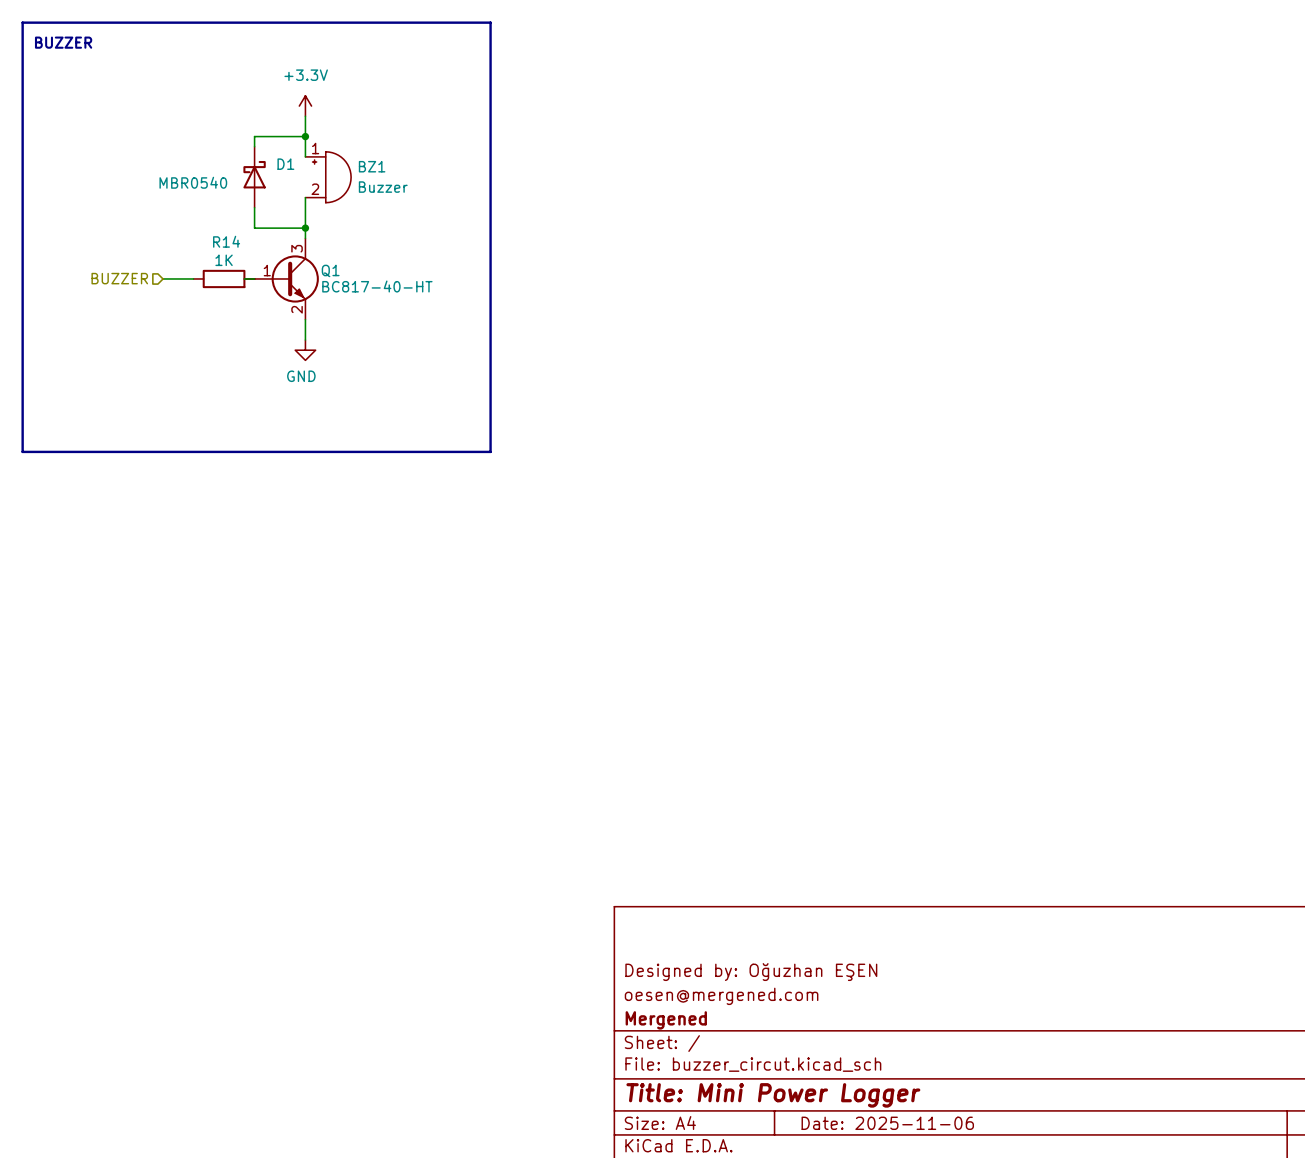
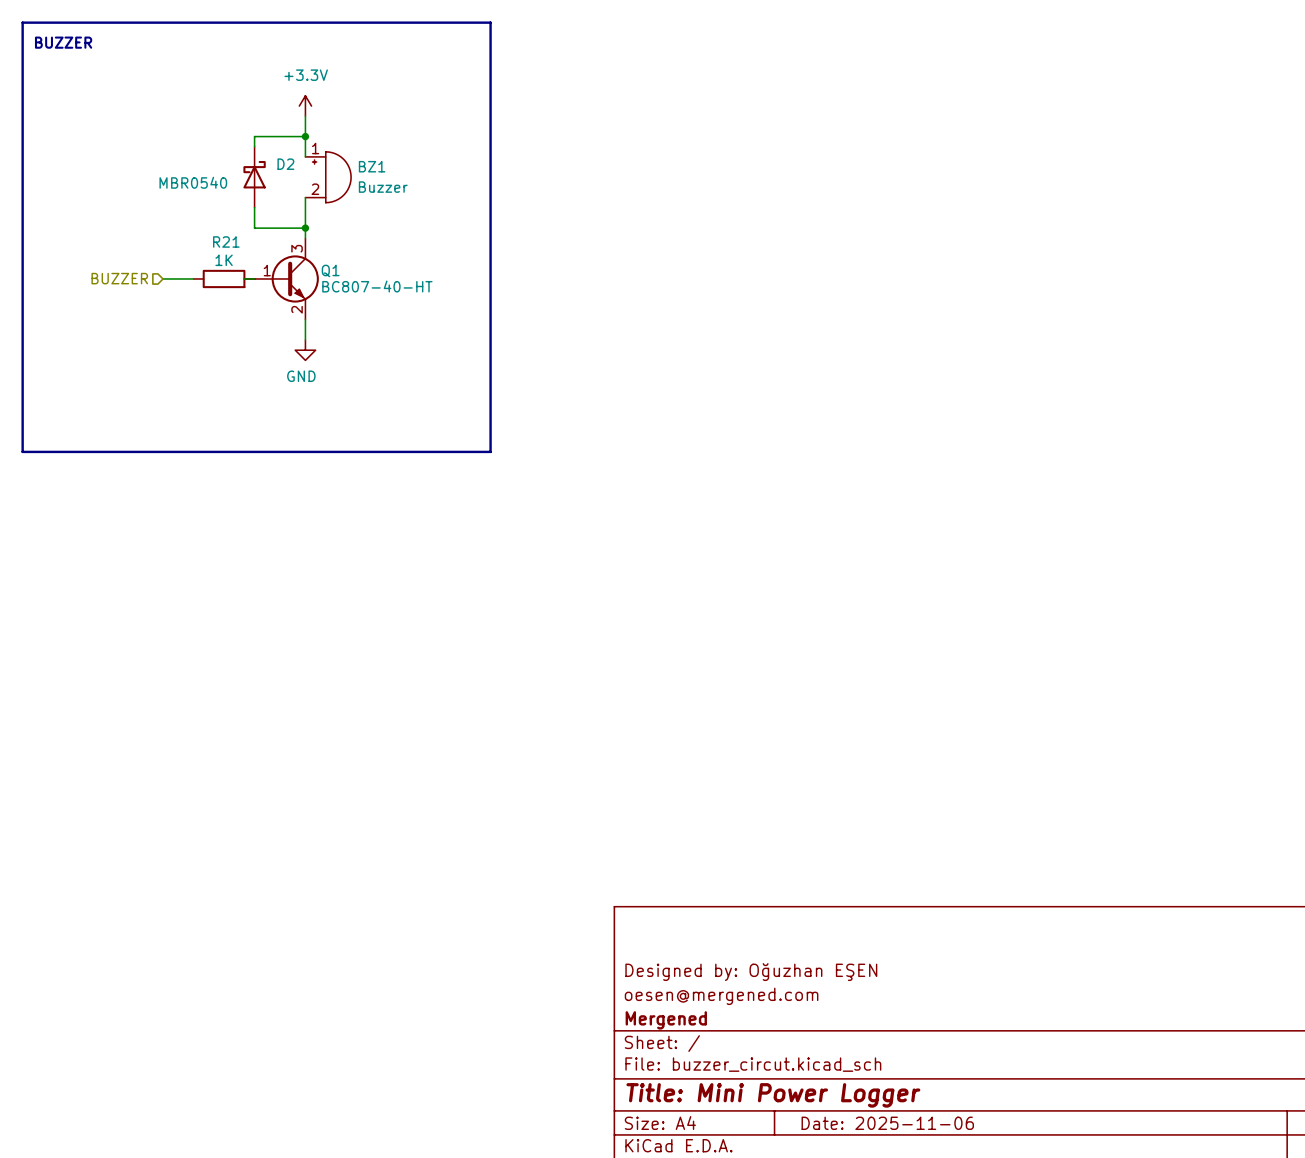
D1 name: D1 (285, 164) -> D2 (285, 164)
R14 name: R14 (226, 241) -> R21 (226, 241)
Q1 value: BC817-40-HT (377, 286) -> BC807-40-HT (377, 286)

